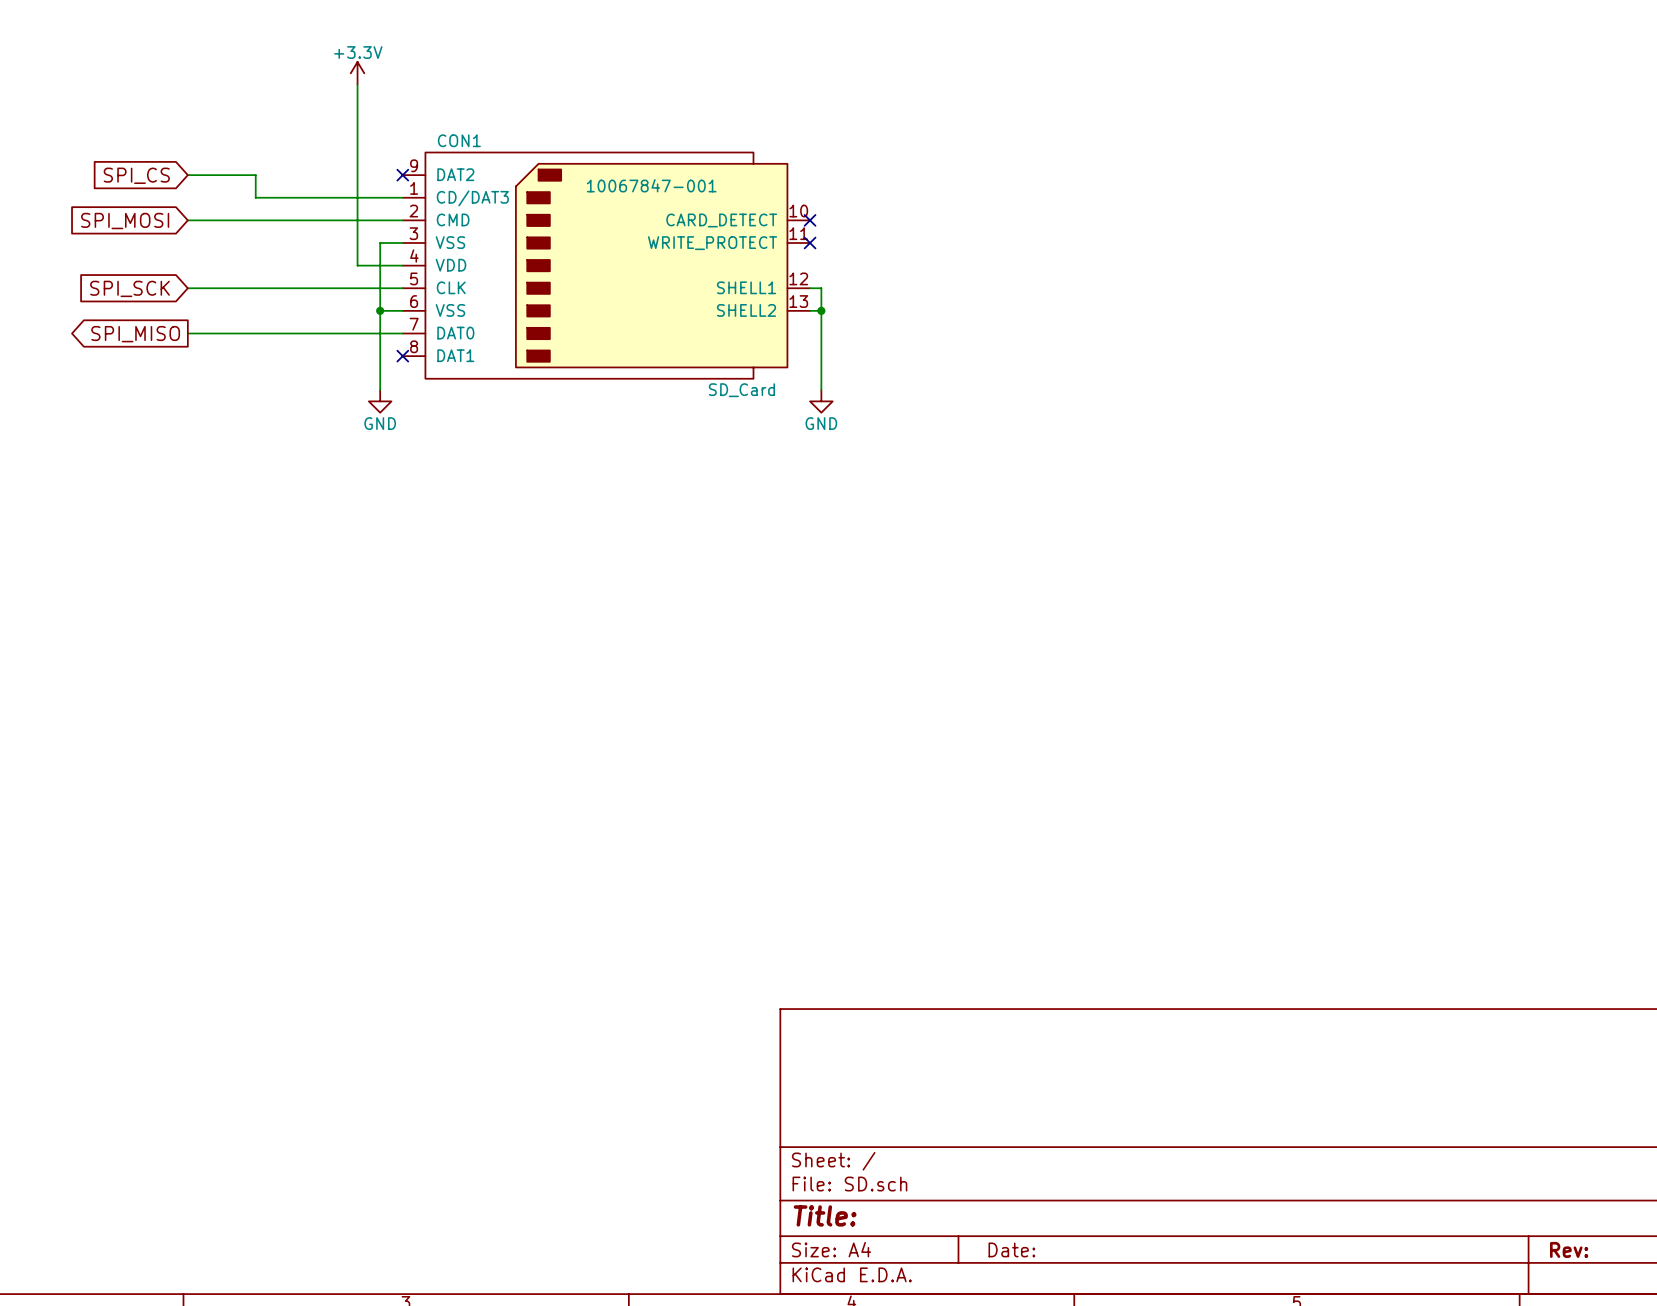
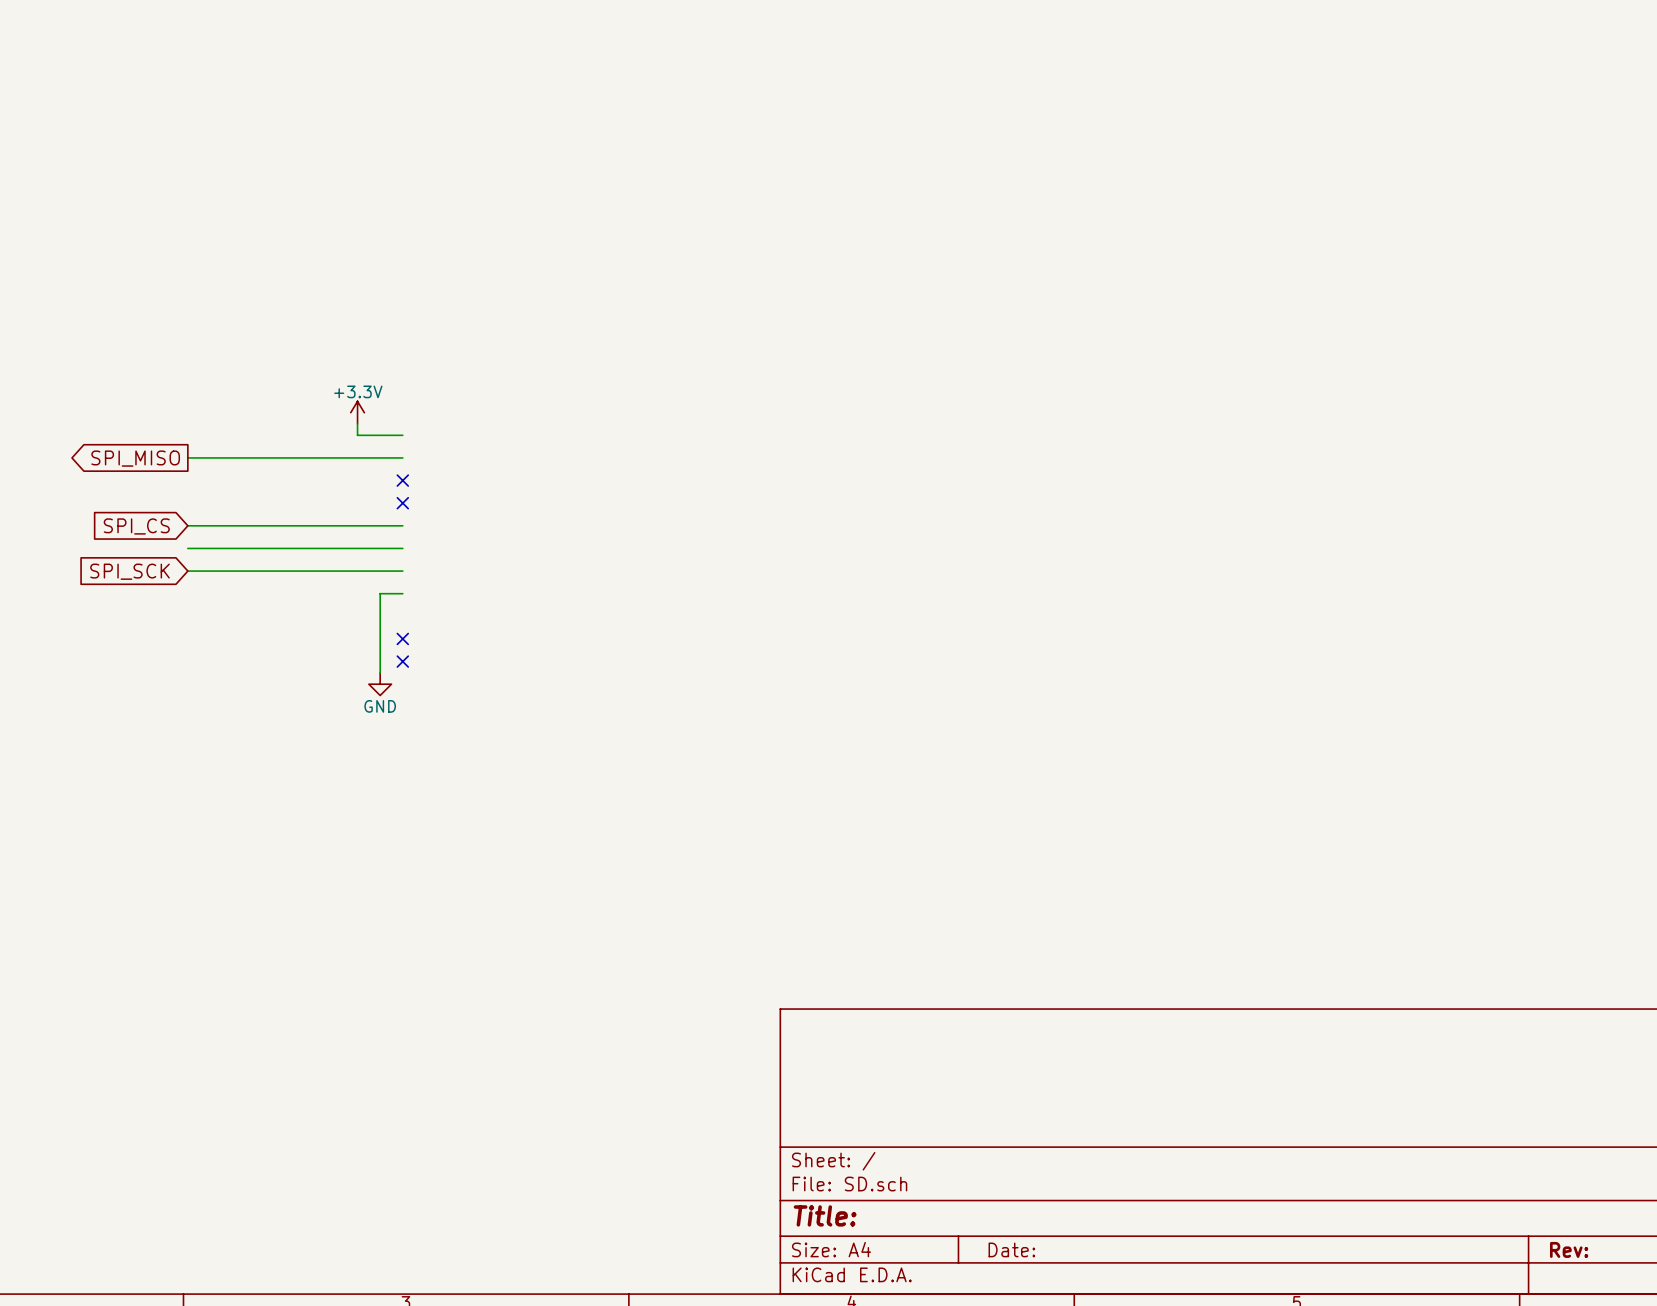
power symbol: +3.3V (357, 73) -> none
wire: (357, 84) (357, 265) (402, 265) -> none
global label: SPI_CS (136, 175) -> none
wire: (187, 175) (255, 175) (255, 197) (402, 197) -> none
no-connect mark: (402, 175) -> none
wire: (187, 220) (402, 220) -> none
no-connect mark: (810, 220) -> none
global label: SPI_MOSI (125, 221) -> none
wire: (402, 243) (380, 243) (380, 390) -> none
no-connect mark: (810, 243) -> none
CON1: SD_Card (606, 265) -> none
global label: SPI_SCK (129, 288) -> none
wire: (187, 288) (402, 288) -> none
wire: (810, 288) (821, 288) (821, 390) -> none
wire: (380, 310) (402, 310) -> none
junction: (380, 310) -> none
wire: (810, 310) (821, 310) -> none
junction: (821, 310) -> none
wire: (187, 333) (402, 333) -> (187, 457) (402, 457)
global label position: SPI_MISO (135, 334) -> SPI_MISO (135, 458)
no-connect mark: (402, 356) -> none
power symbol: GND (380, 401) -> none
power symbol: GND (821, 401) -> none
power symbol: none -> +3.3V (357, 412)
wire: none -> (357, 424) (357, 435) (402, 435)
no-connect mark: none -> (402, 480)
no-connect mark: none -> (402, 503)
wire: none -> (187, 525) (402, 525)
global label: none -> SPI_CS (136, 526)
wire: none -> (187, 548) (402, 548)
global label: none -> SPI_SCK (129, 571)
wire: none -> (187, 571) (402, 571)
wire: none -> (402, 593) (380, 593) (380, 672)
no-connect mark: none -> (402, 638)
no-connect mark: none -> (402, 661)
power symbol: none -> GND (380, 684)

